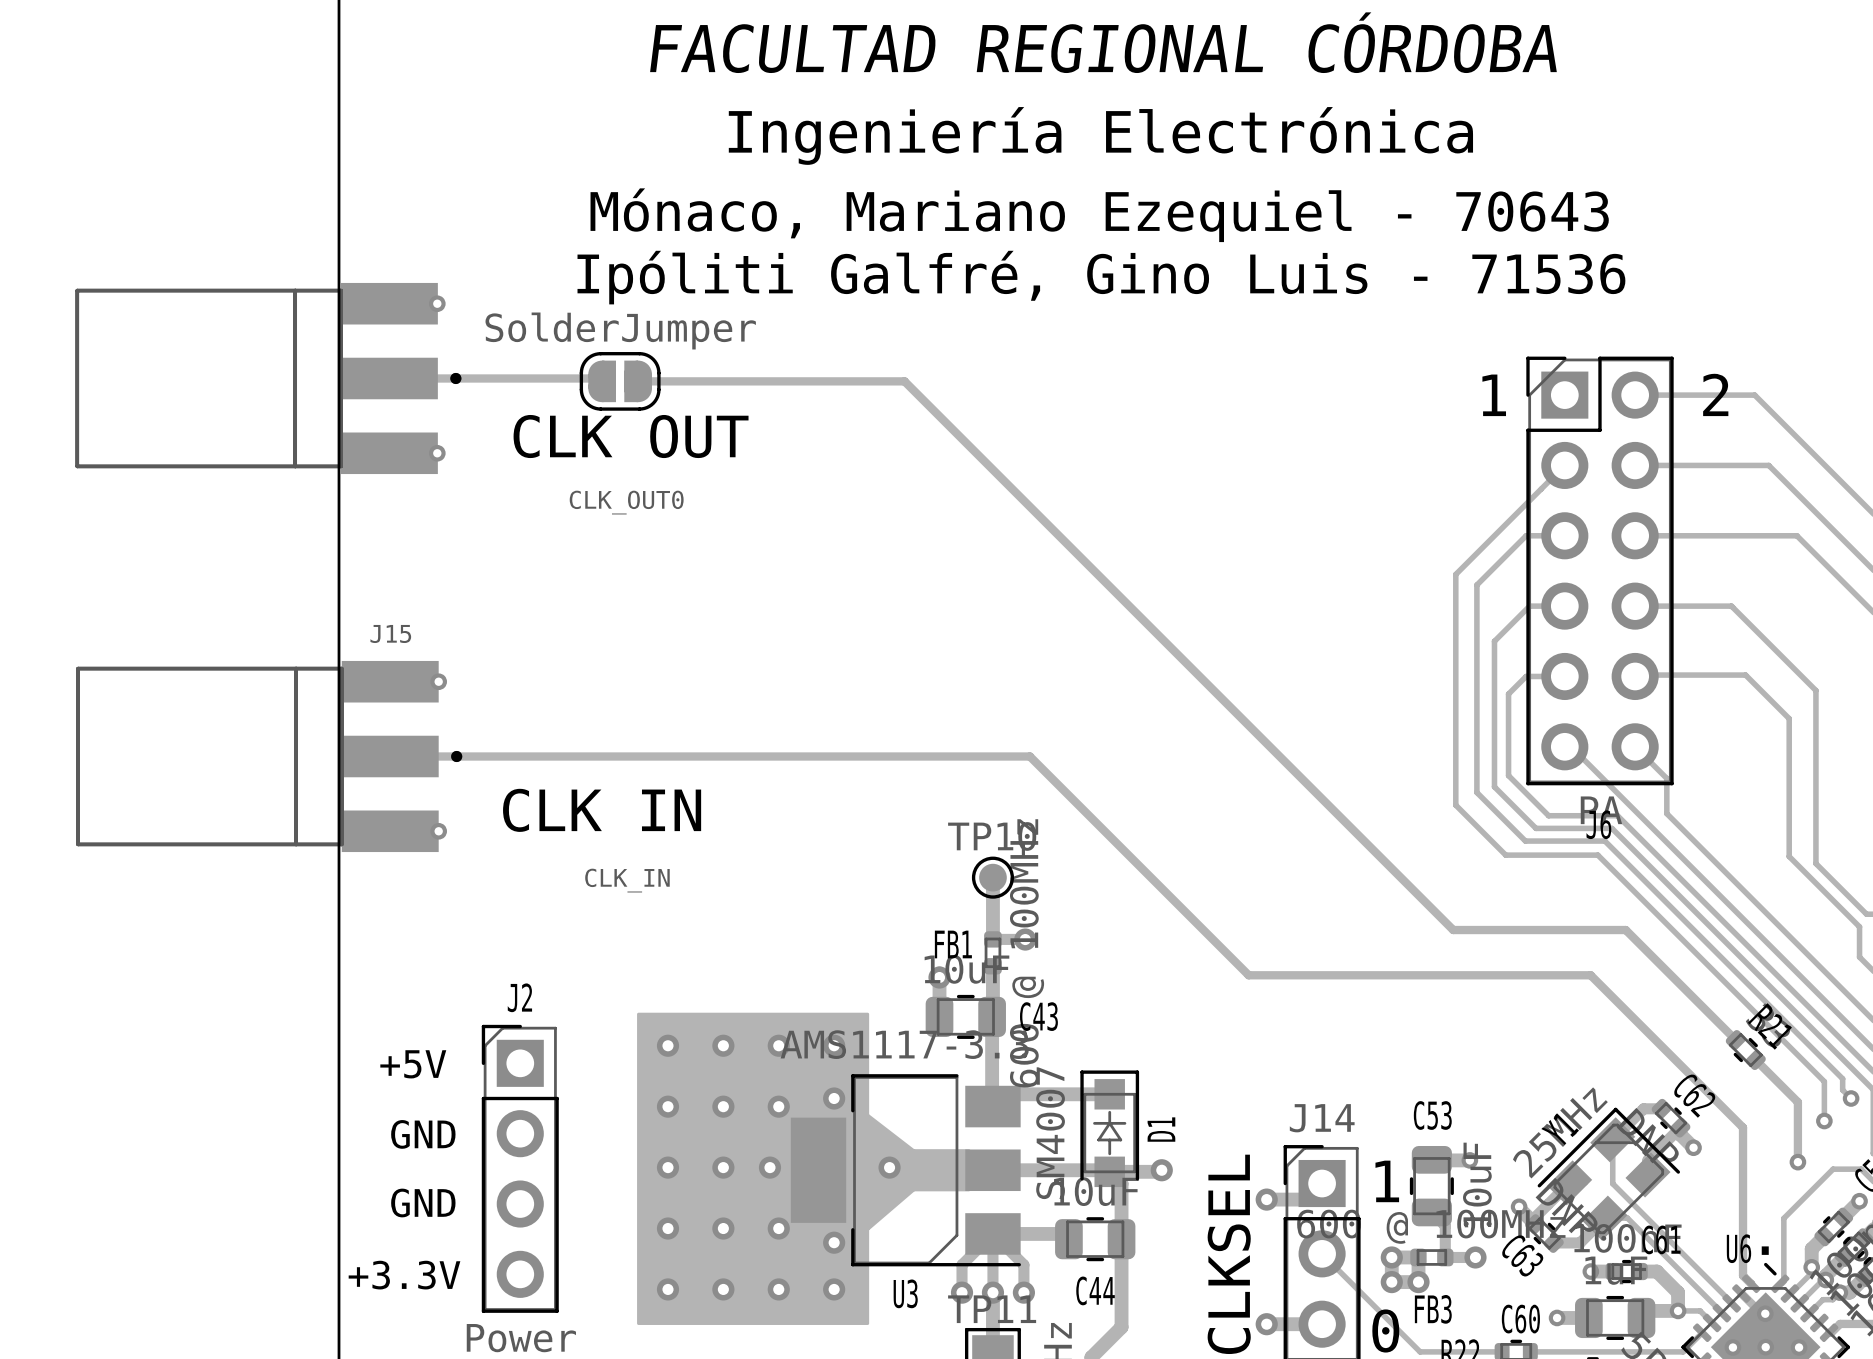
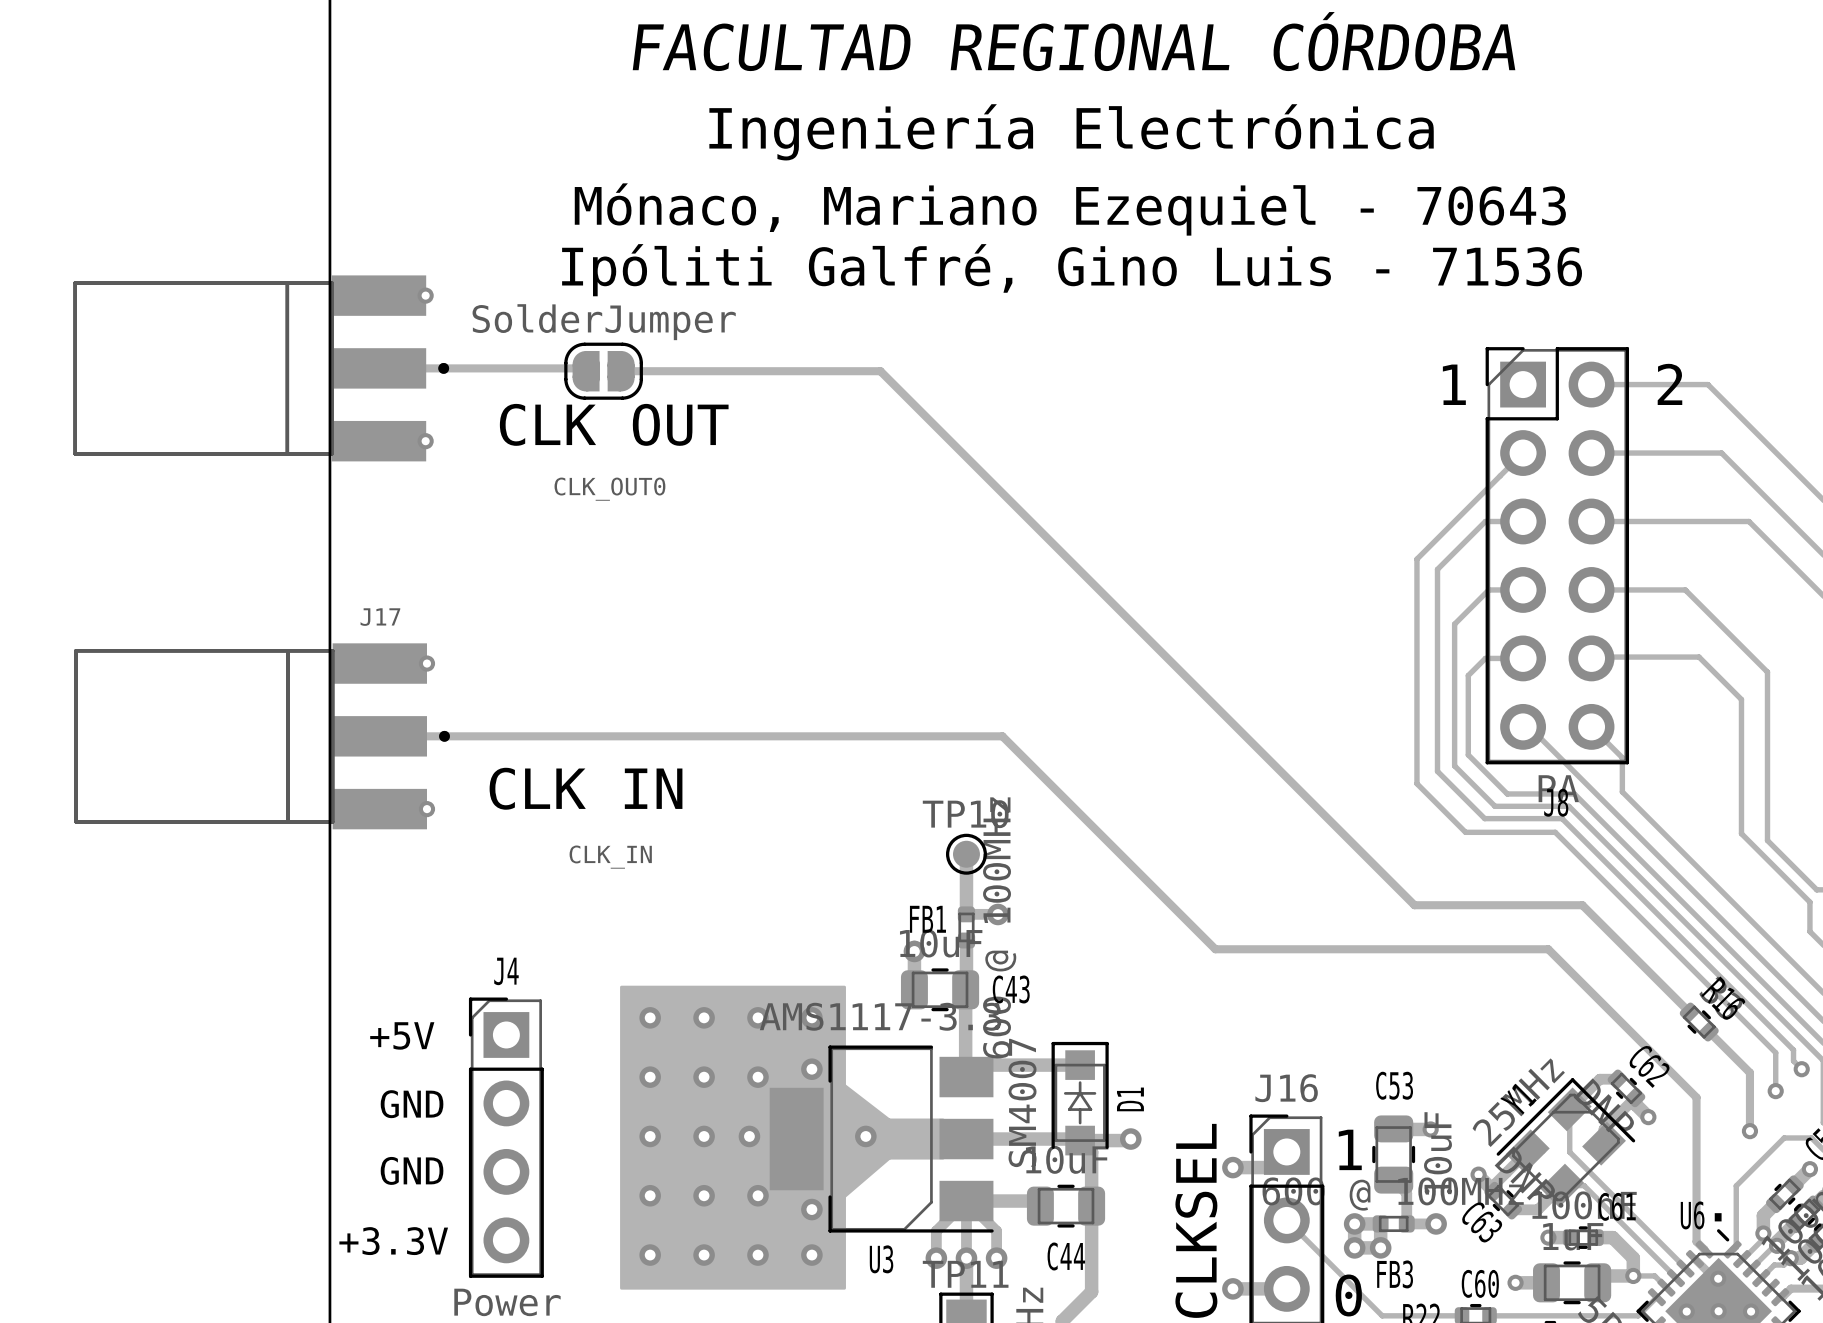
J15 name: J15 (390, 633) -> J17 (380, 617)
J6 name: J6 (1598, 824) -> J8 (1556, 802)
J2 name: J2 (519, 997) -> J4 (506, 971)
R21 name: R21 (1769, 1026) -> R16 (1723, 998)
J14 name: J14 (1322, 1118) -> J16 (1286, 1088)

